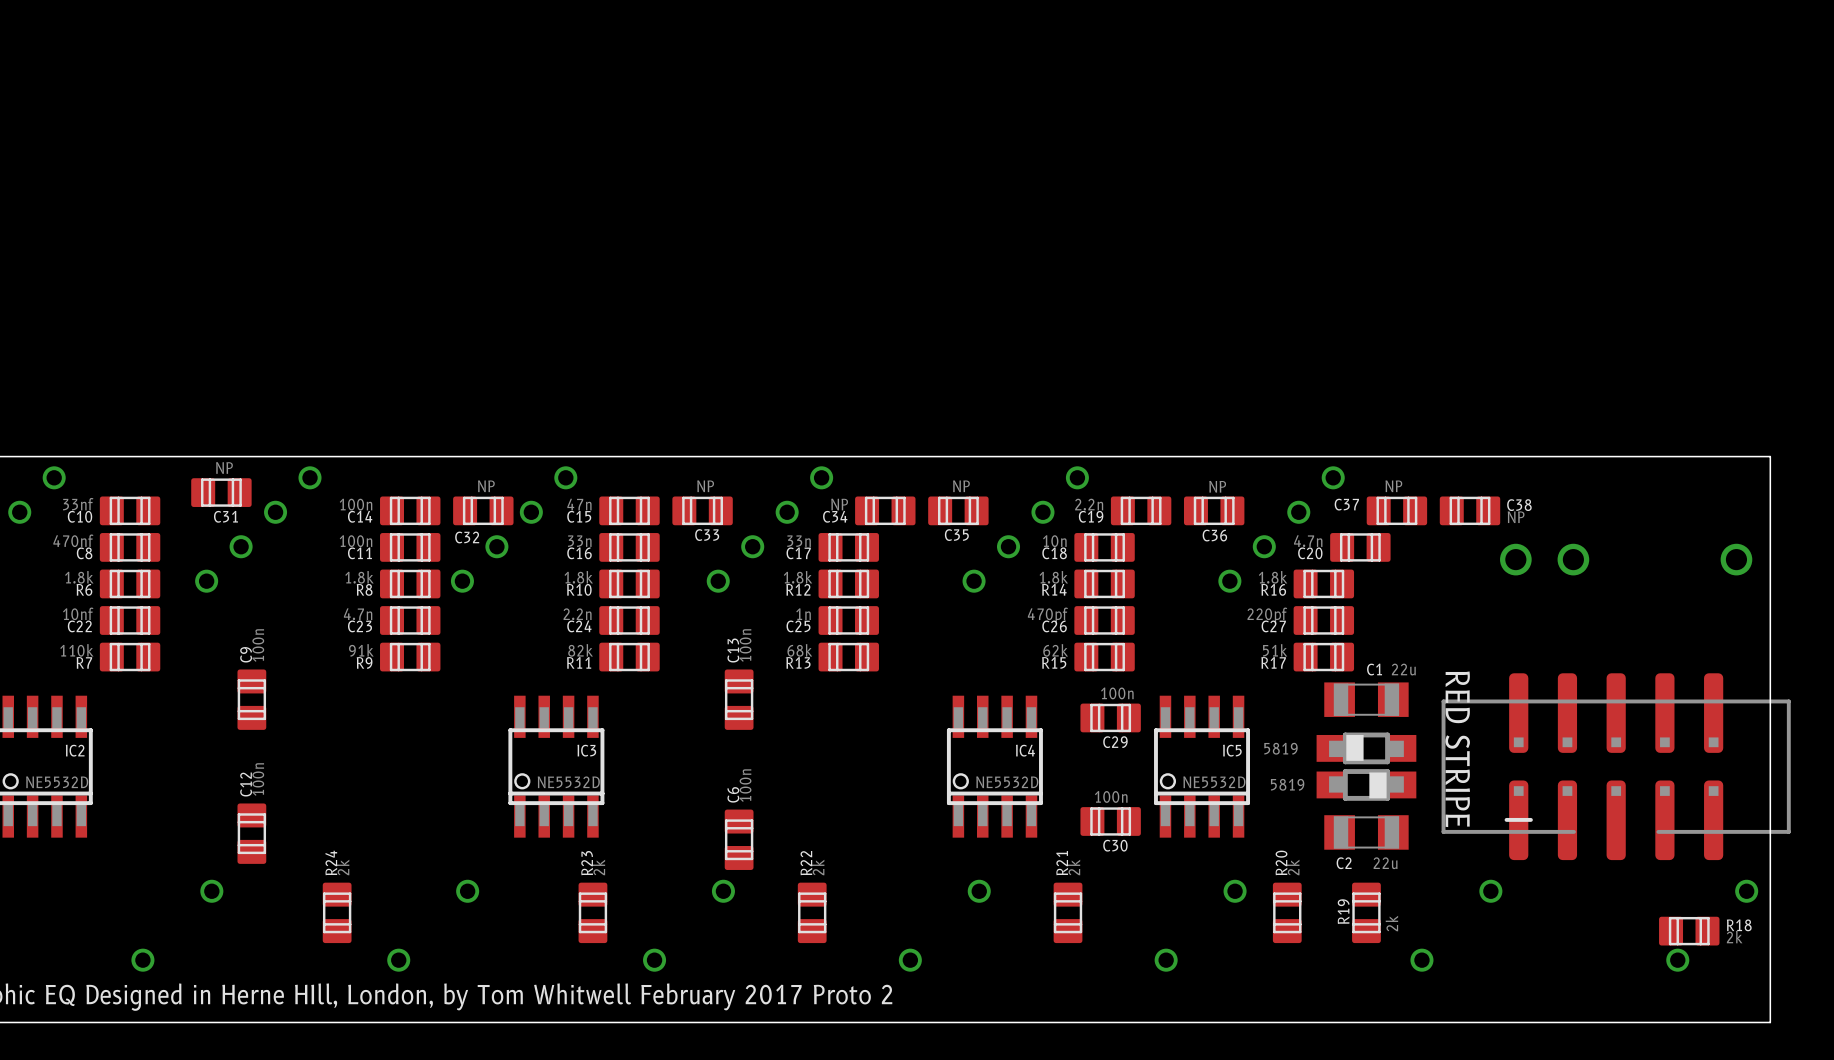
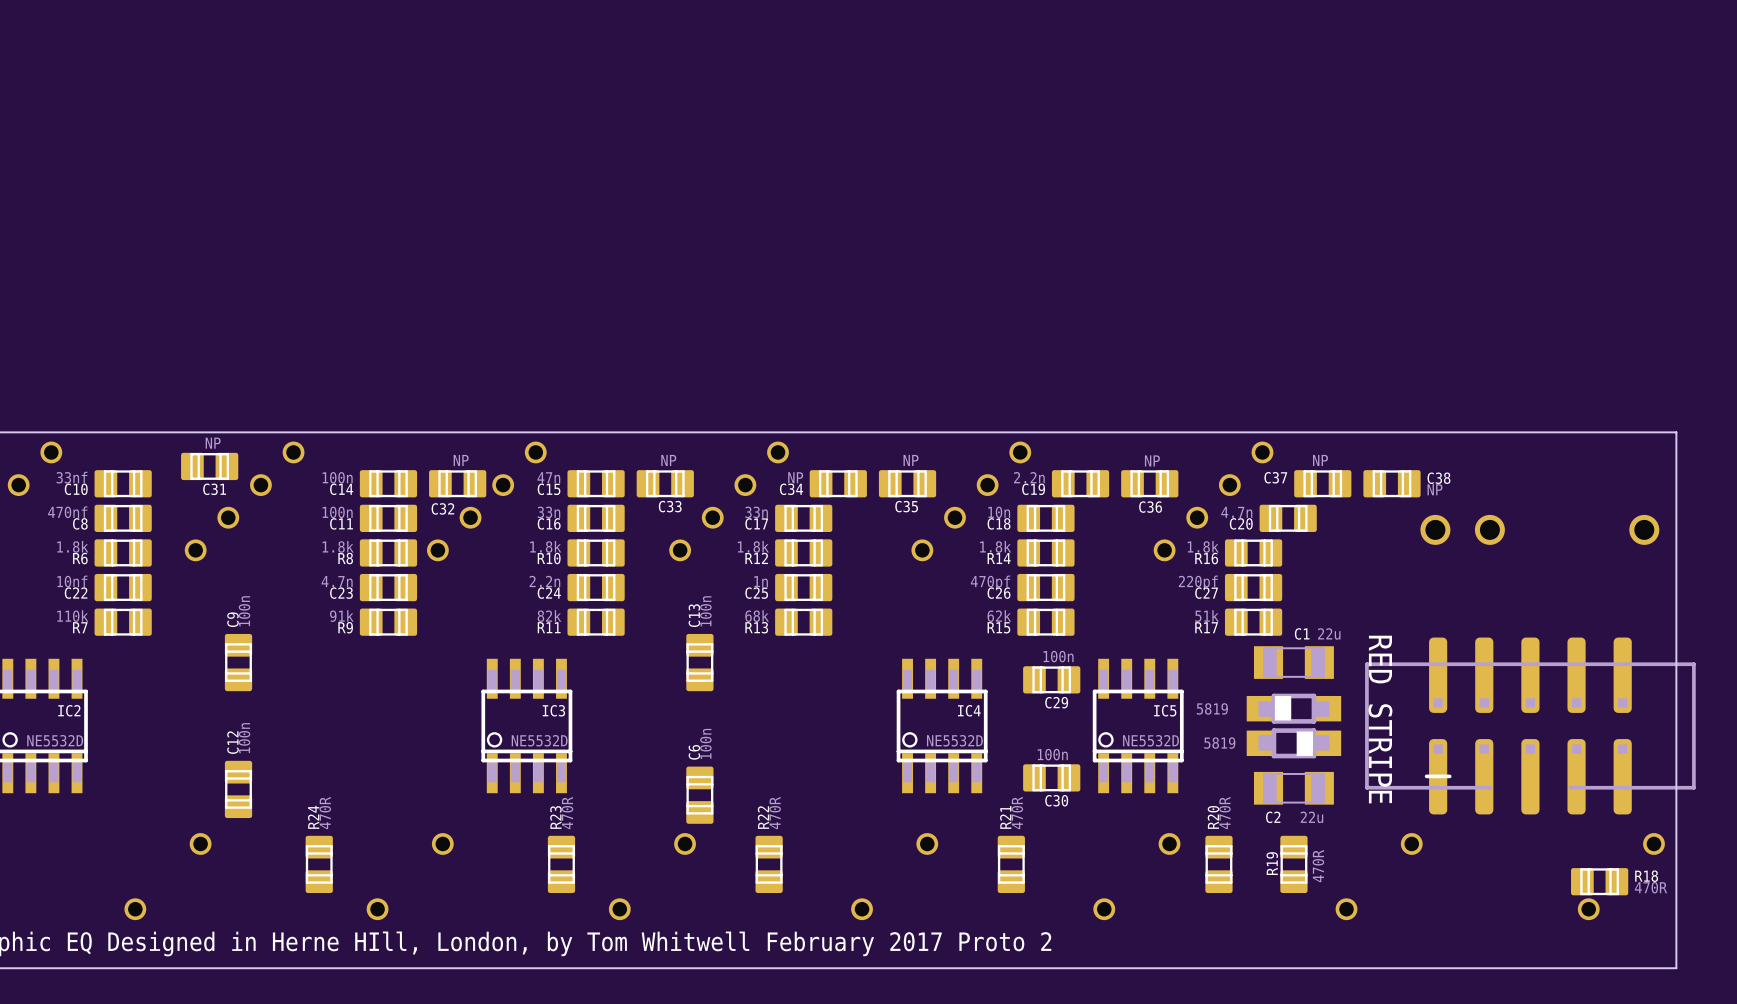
R24 value: 2k (343, 867) -> 470R (325, 813)
R23 value: 2k (598, 867) -> 470R (567, 813)
R22 value: 2k (818, 867) -> 470R (775, 813)
R21 value: 2k (1073, 867) -> 470R (1017, 813)
R20 value: 2k (1293, 867) -> 470R (1224, 813)
R19 value: 2k (1391, 923) -> 470R (1318, 866)
R18 value: 2k (1734, 937) -> 470R (1651, 887)

